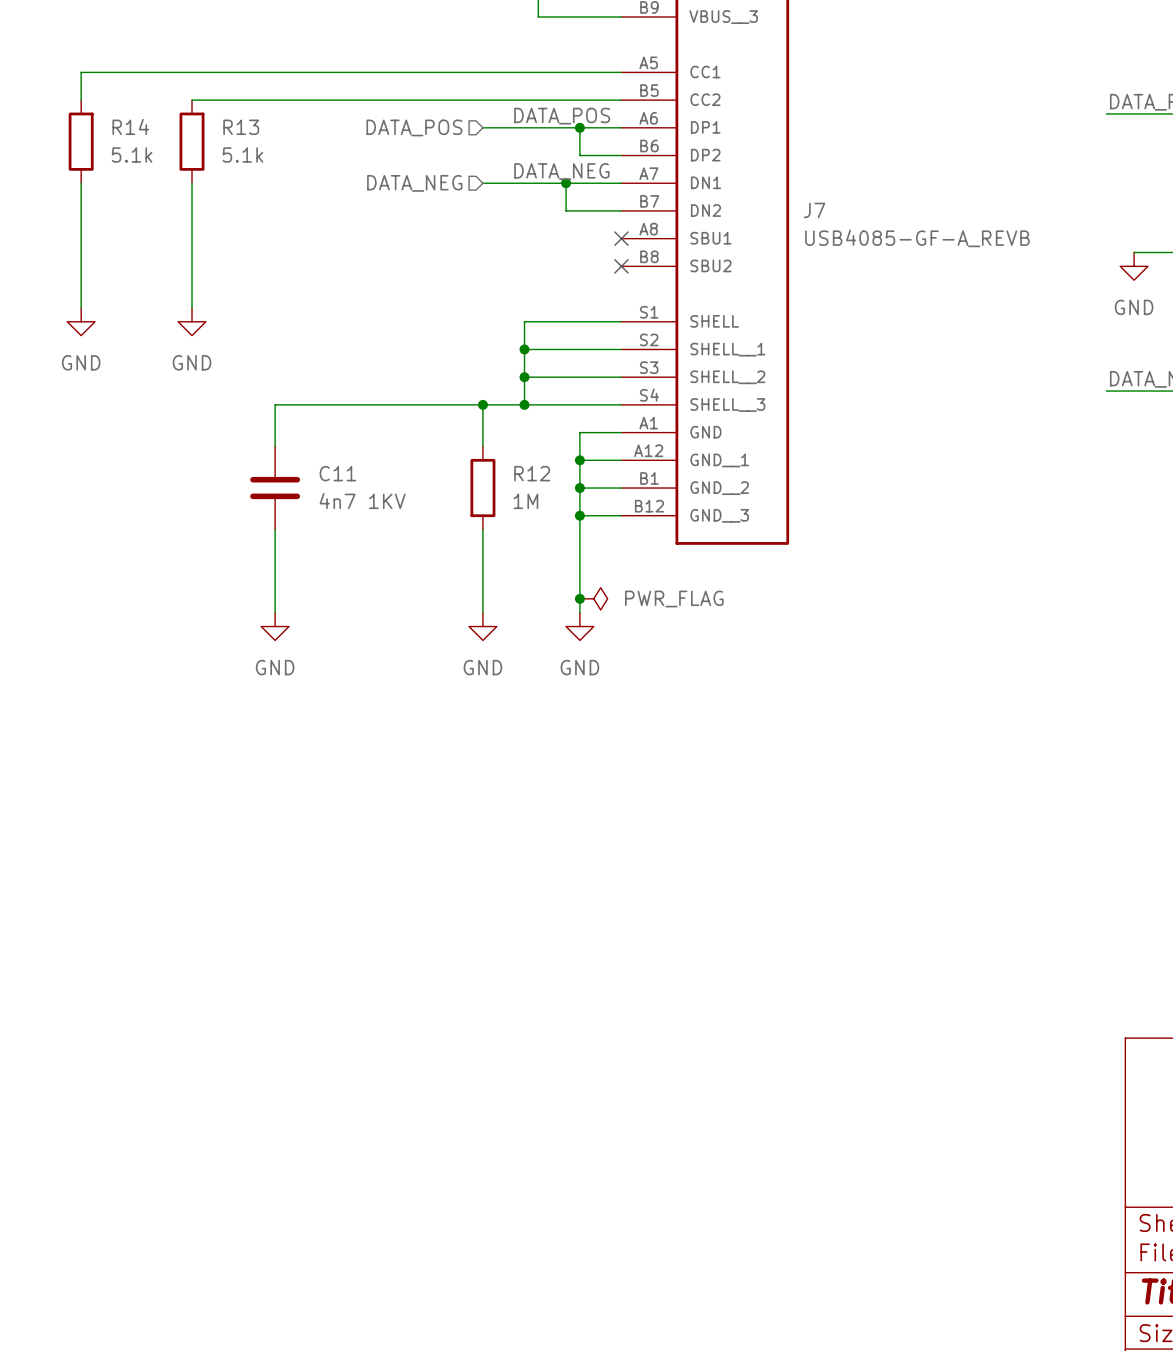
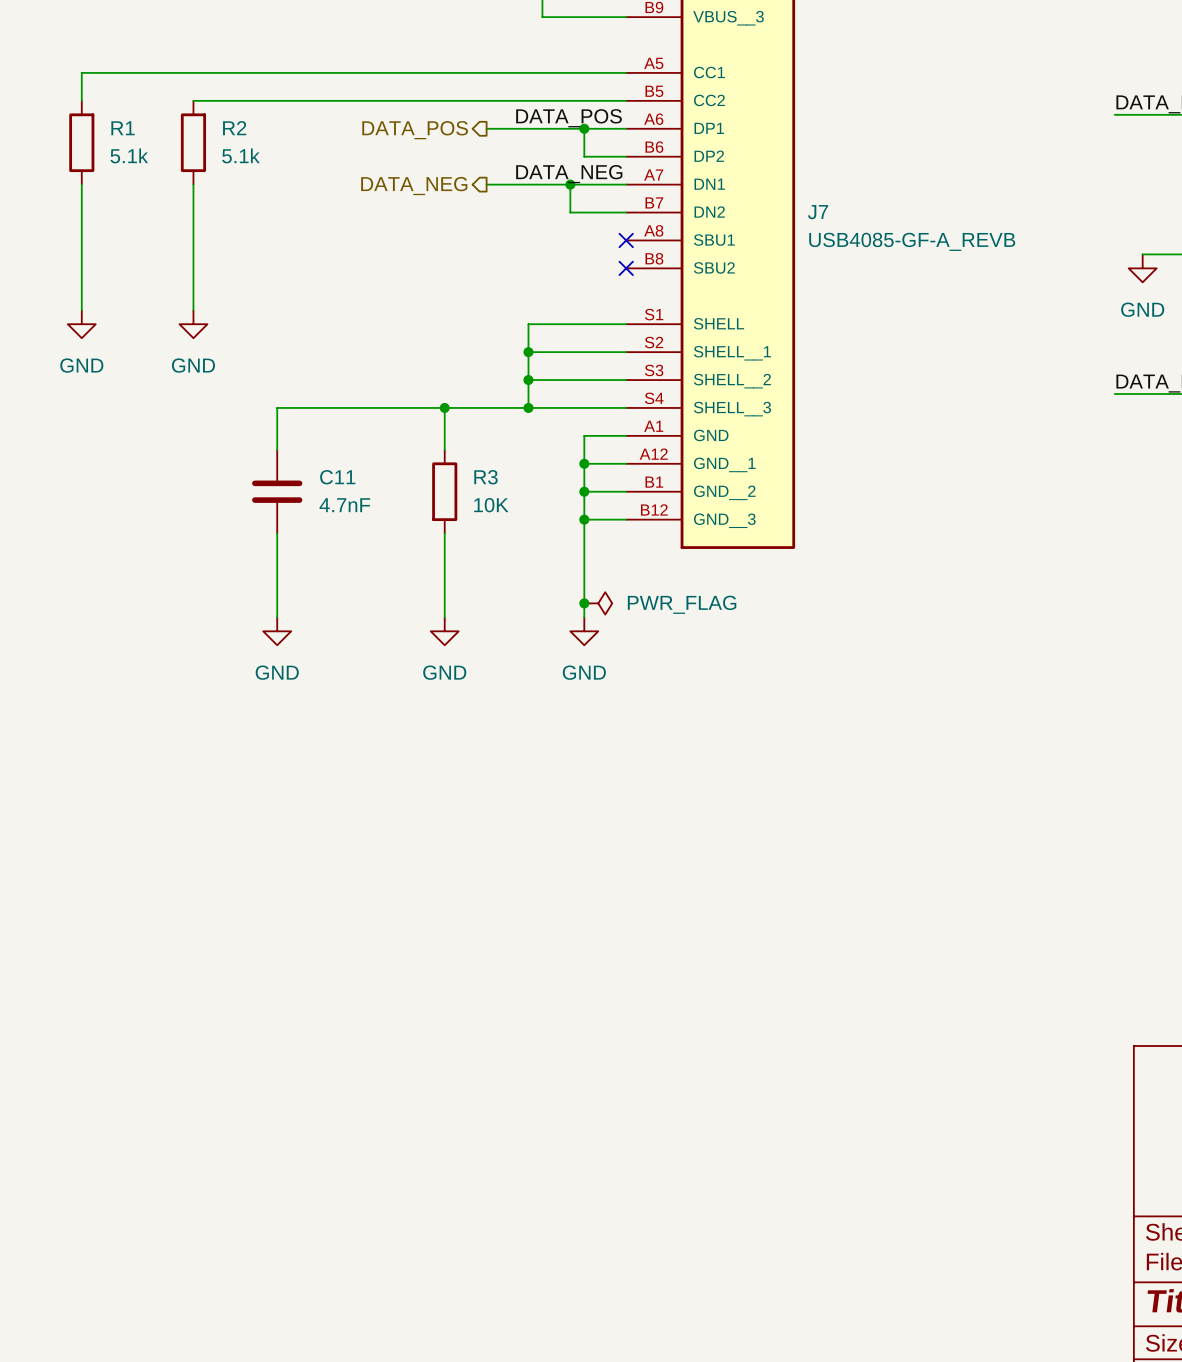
R14 name: R14 (130, 126) -> R1 (123, 128)
R13 name: R13 (241, 127) -> R2 (234, 128)
hierarchical label shape: input (414, 127) -> output (415, 130)
hierarchical label shape: input (414, 183) -> output (414, 186)
wire: (482, 404) (482, 446) -> (444, 407) (444, 449)
junction position: (482, 404) -> (444, 407)
R3: none -> 10K (444, 491)
R12: 1M (482, 488) -> none
C11 value: 4n7 1KV (362, 501) -> 4.7nF (344, 505)
wire: (482, 529) (482, 612) -> (444, 533) (444, 617)
power symbol position: GND (482, 626) -> GND (444, 631)

